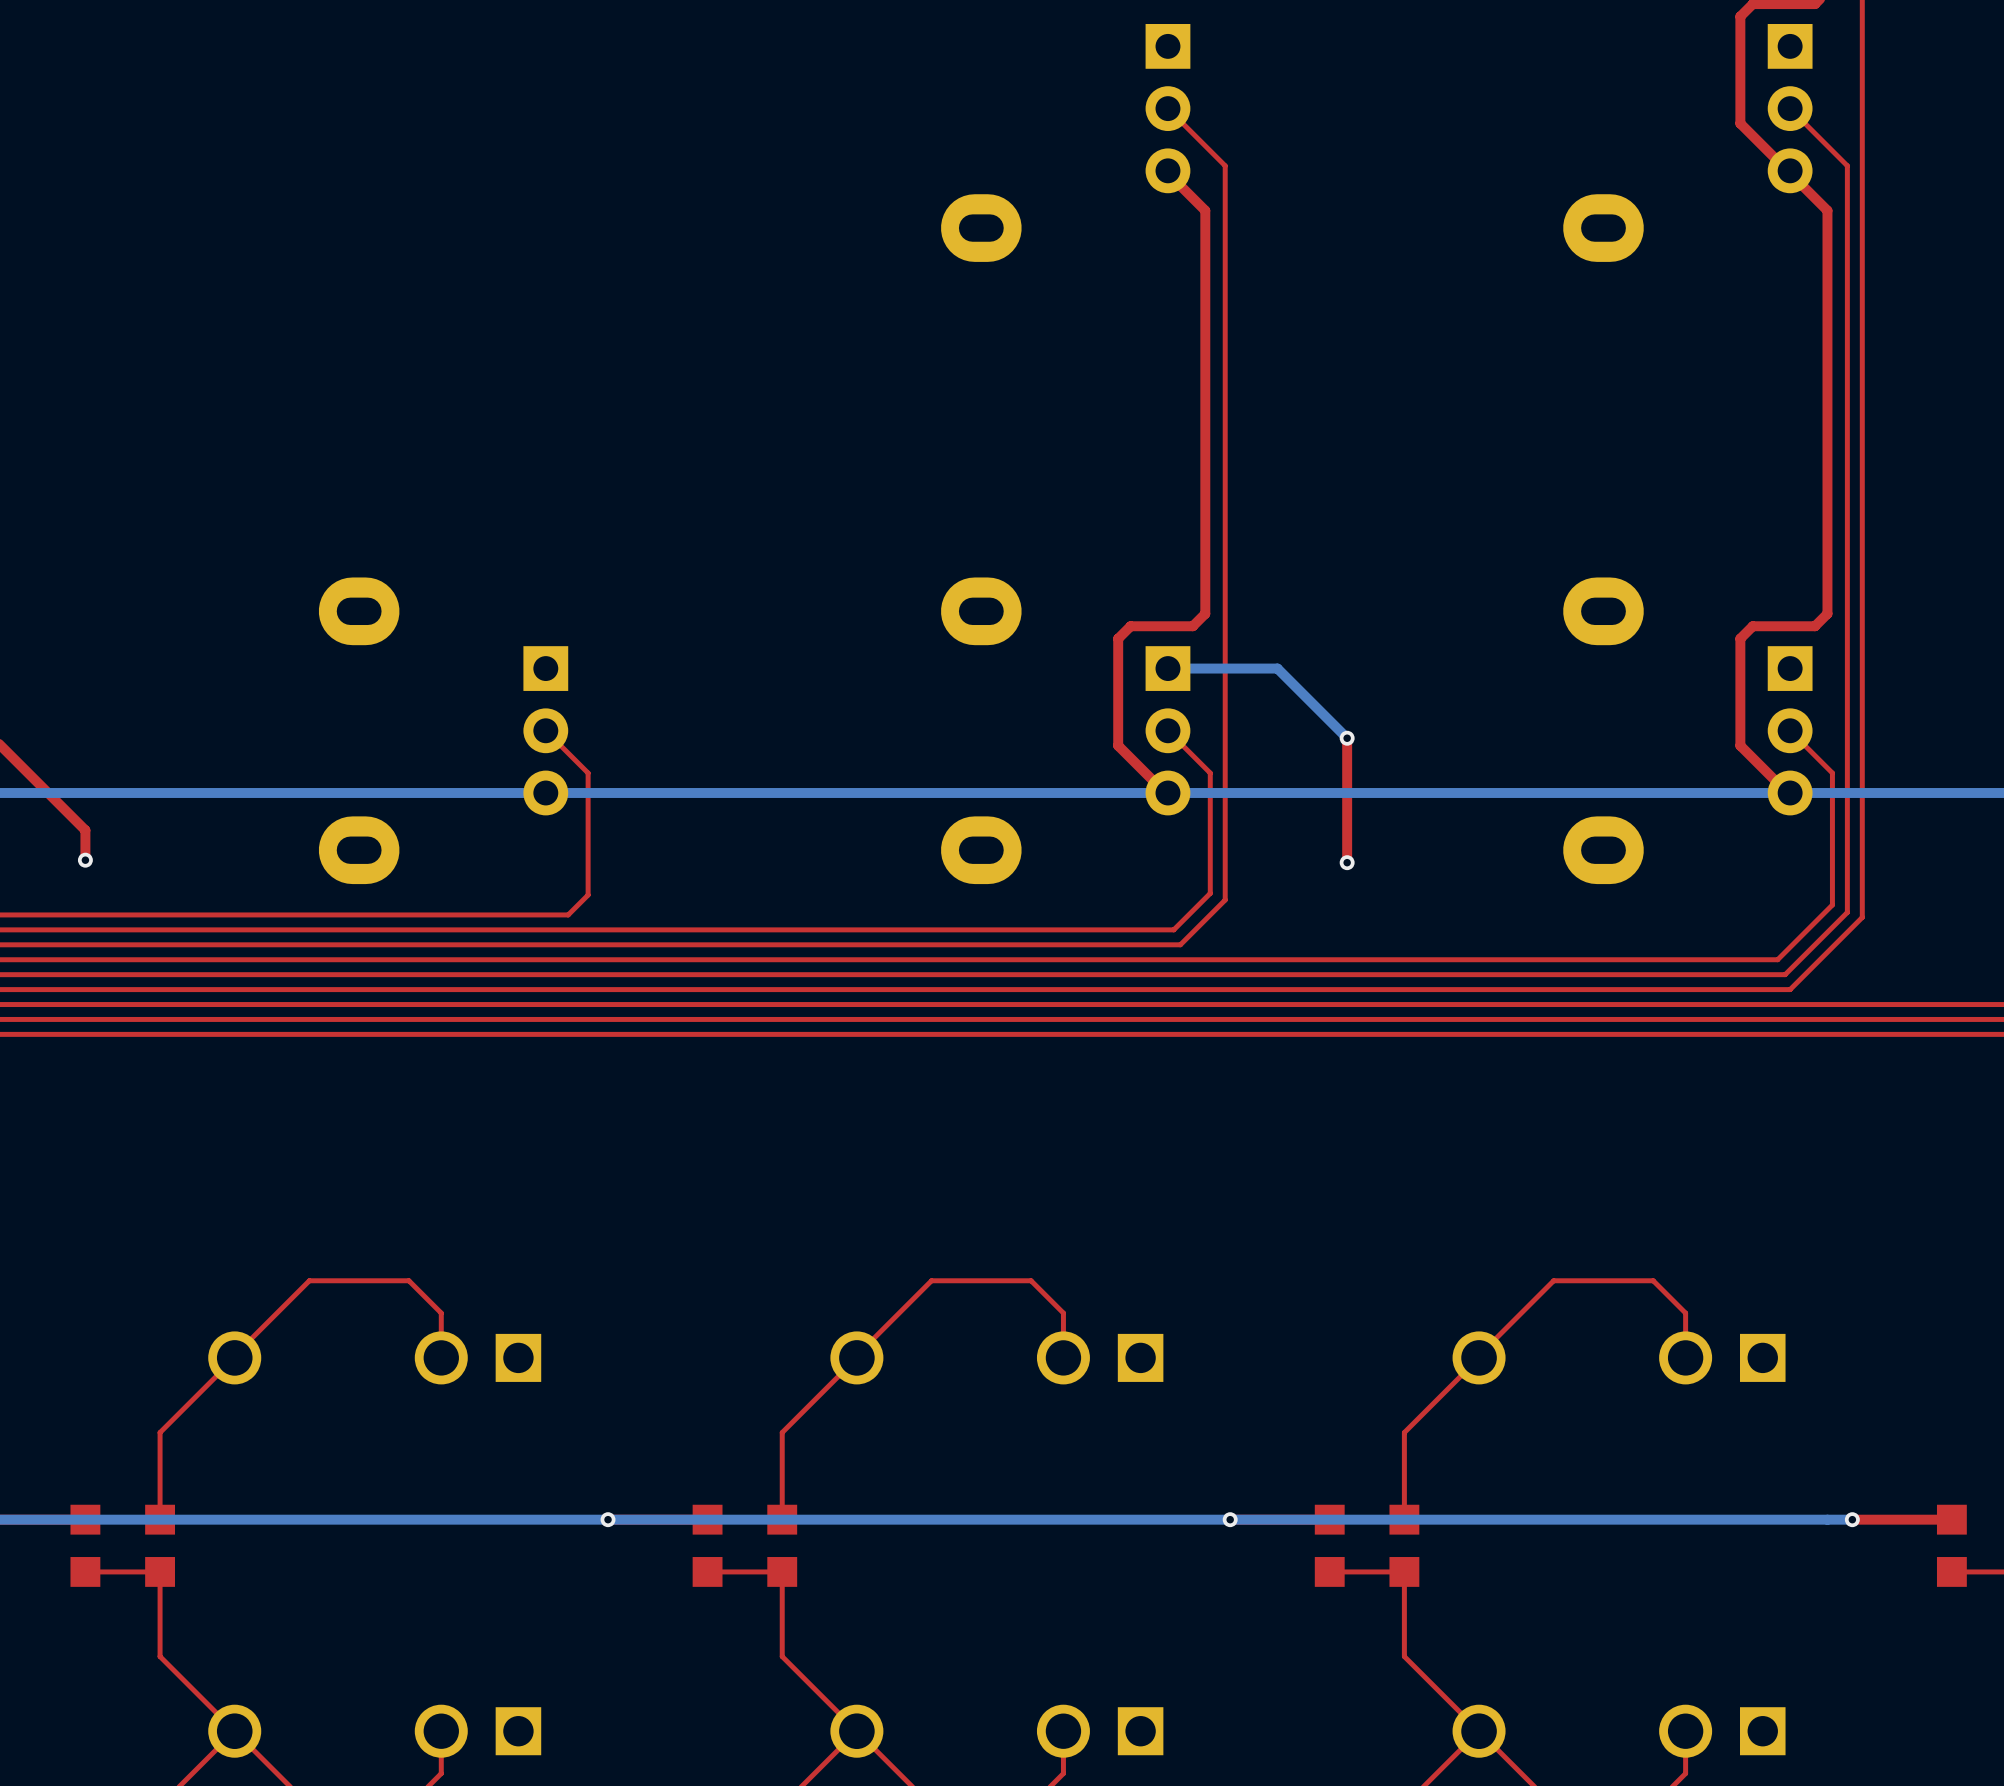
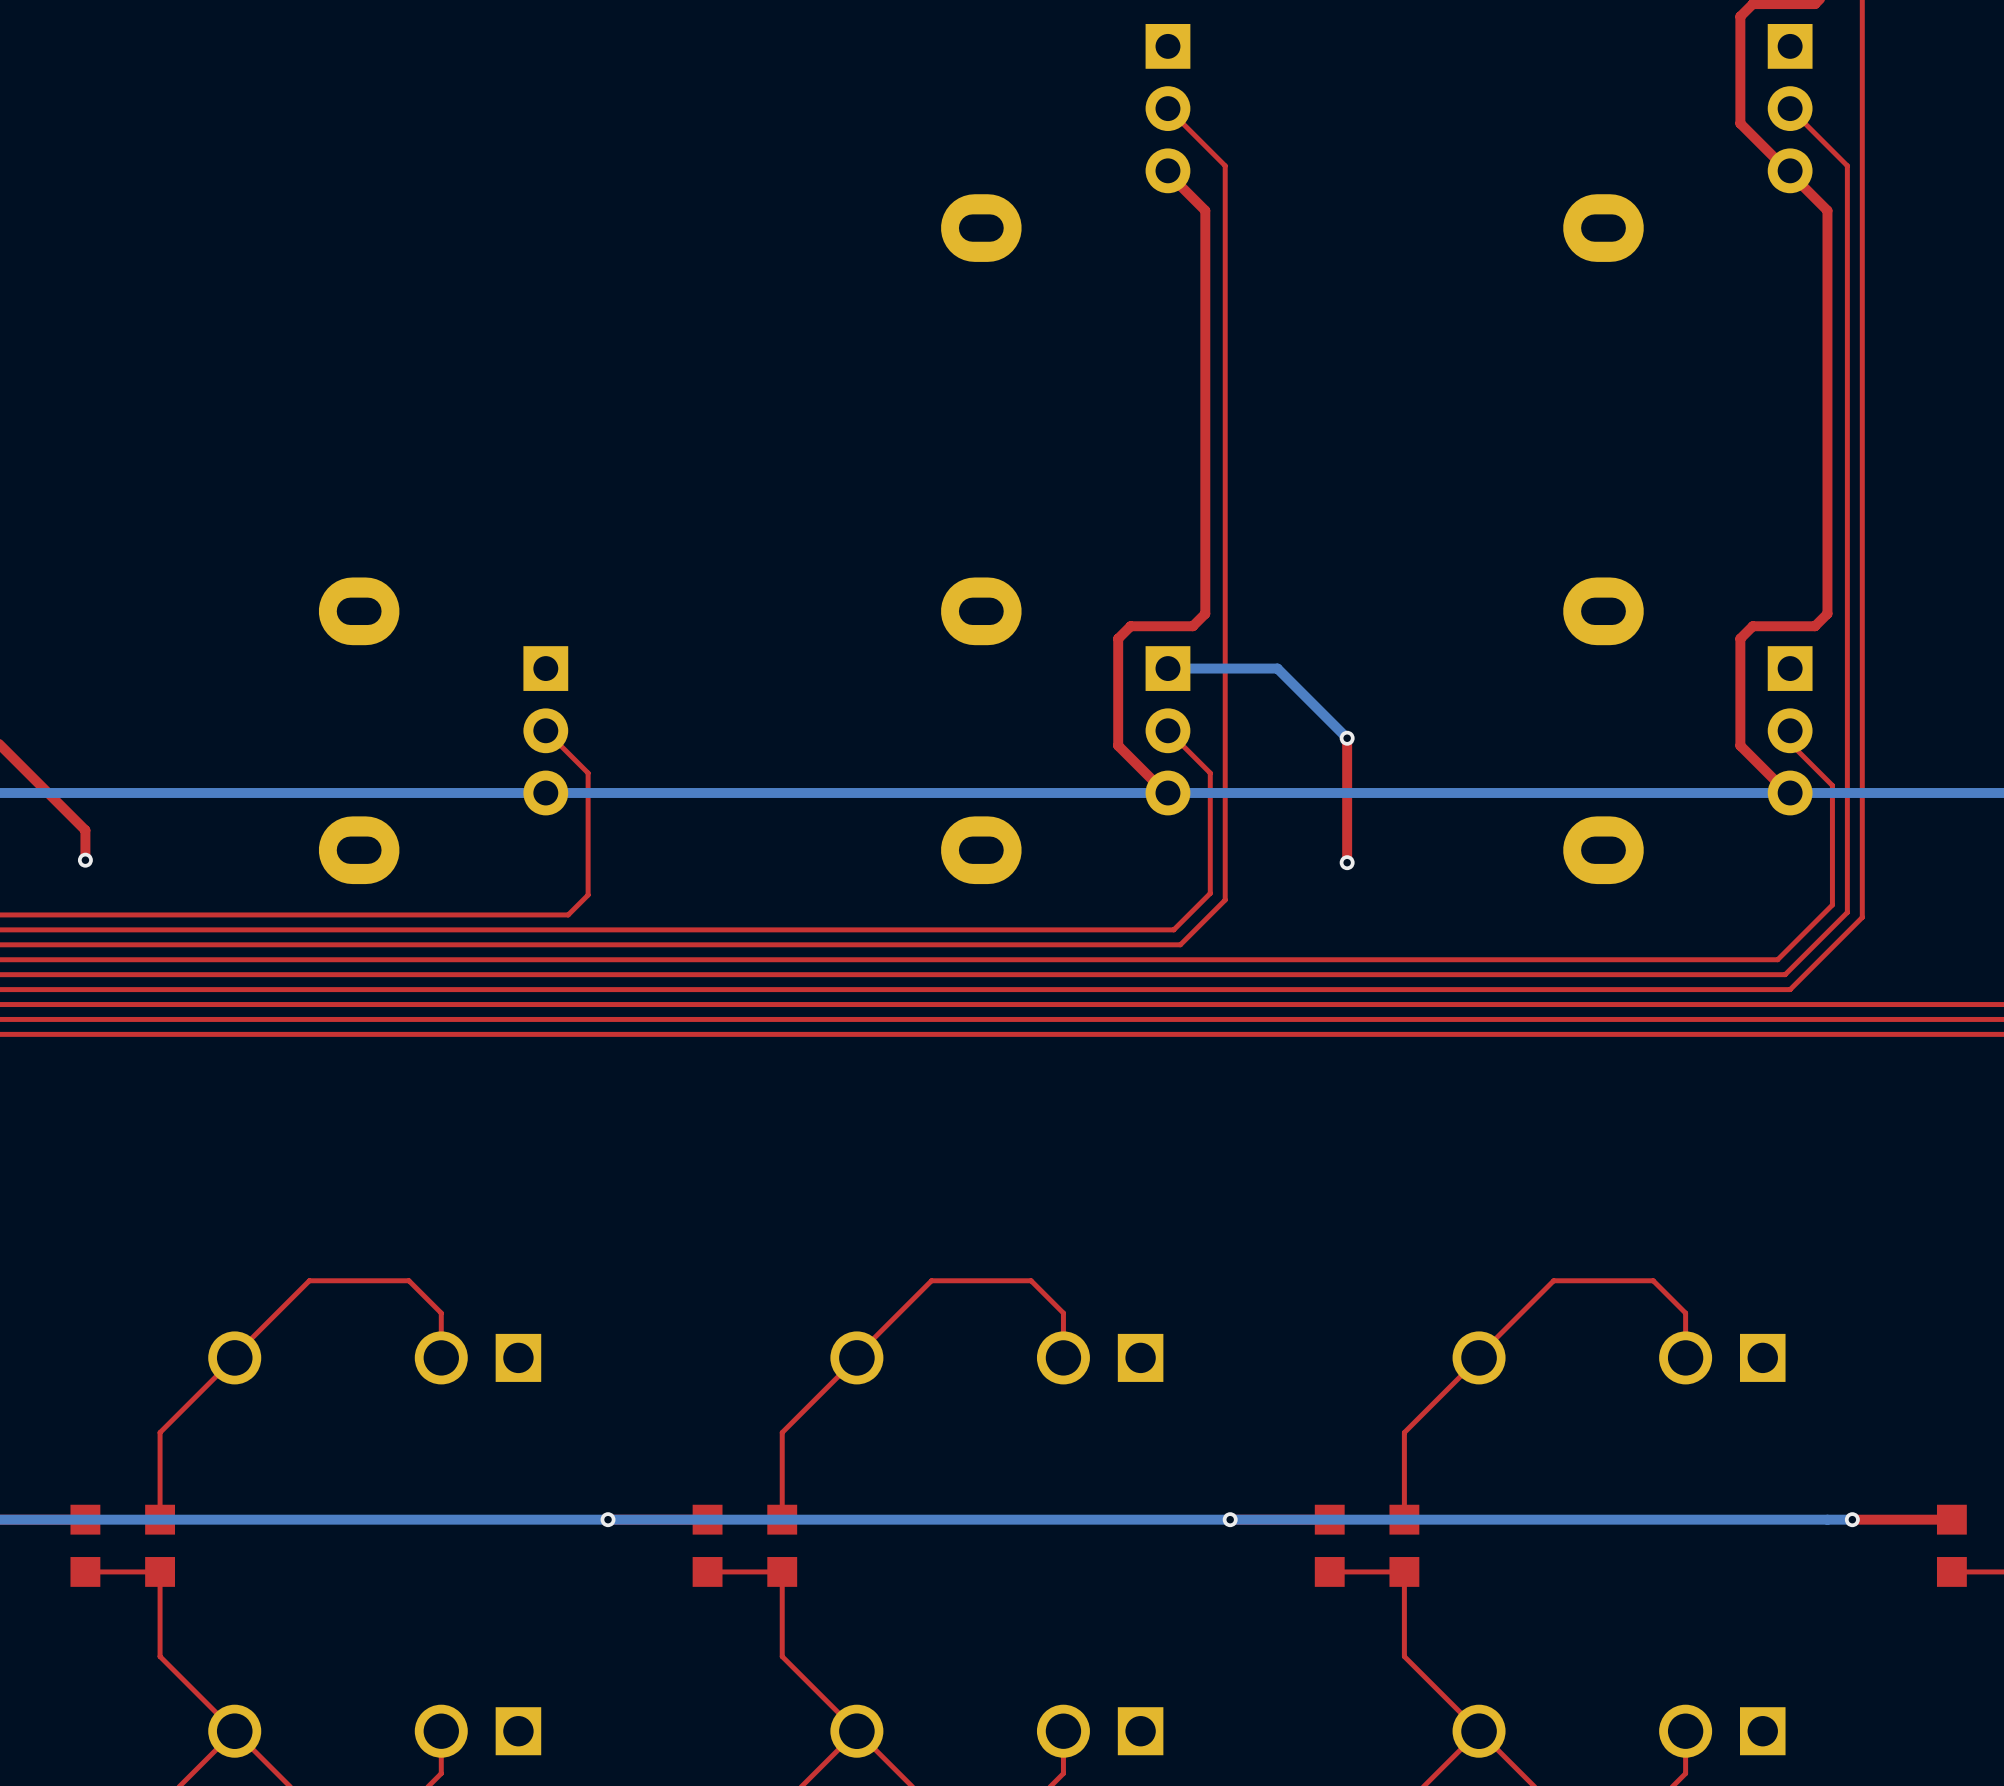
top track: (1790, 730) (1832, 773) (1832, 785) -> (1777, 730) (1832, 785)

